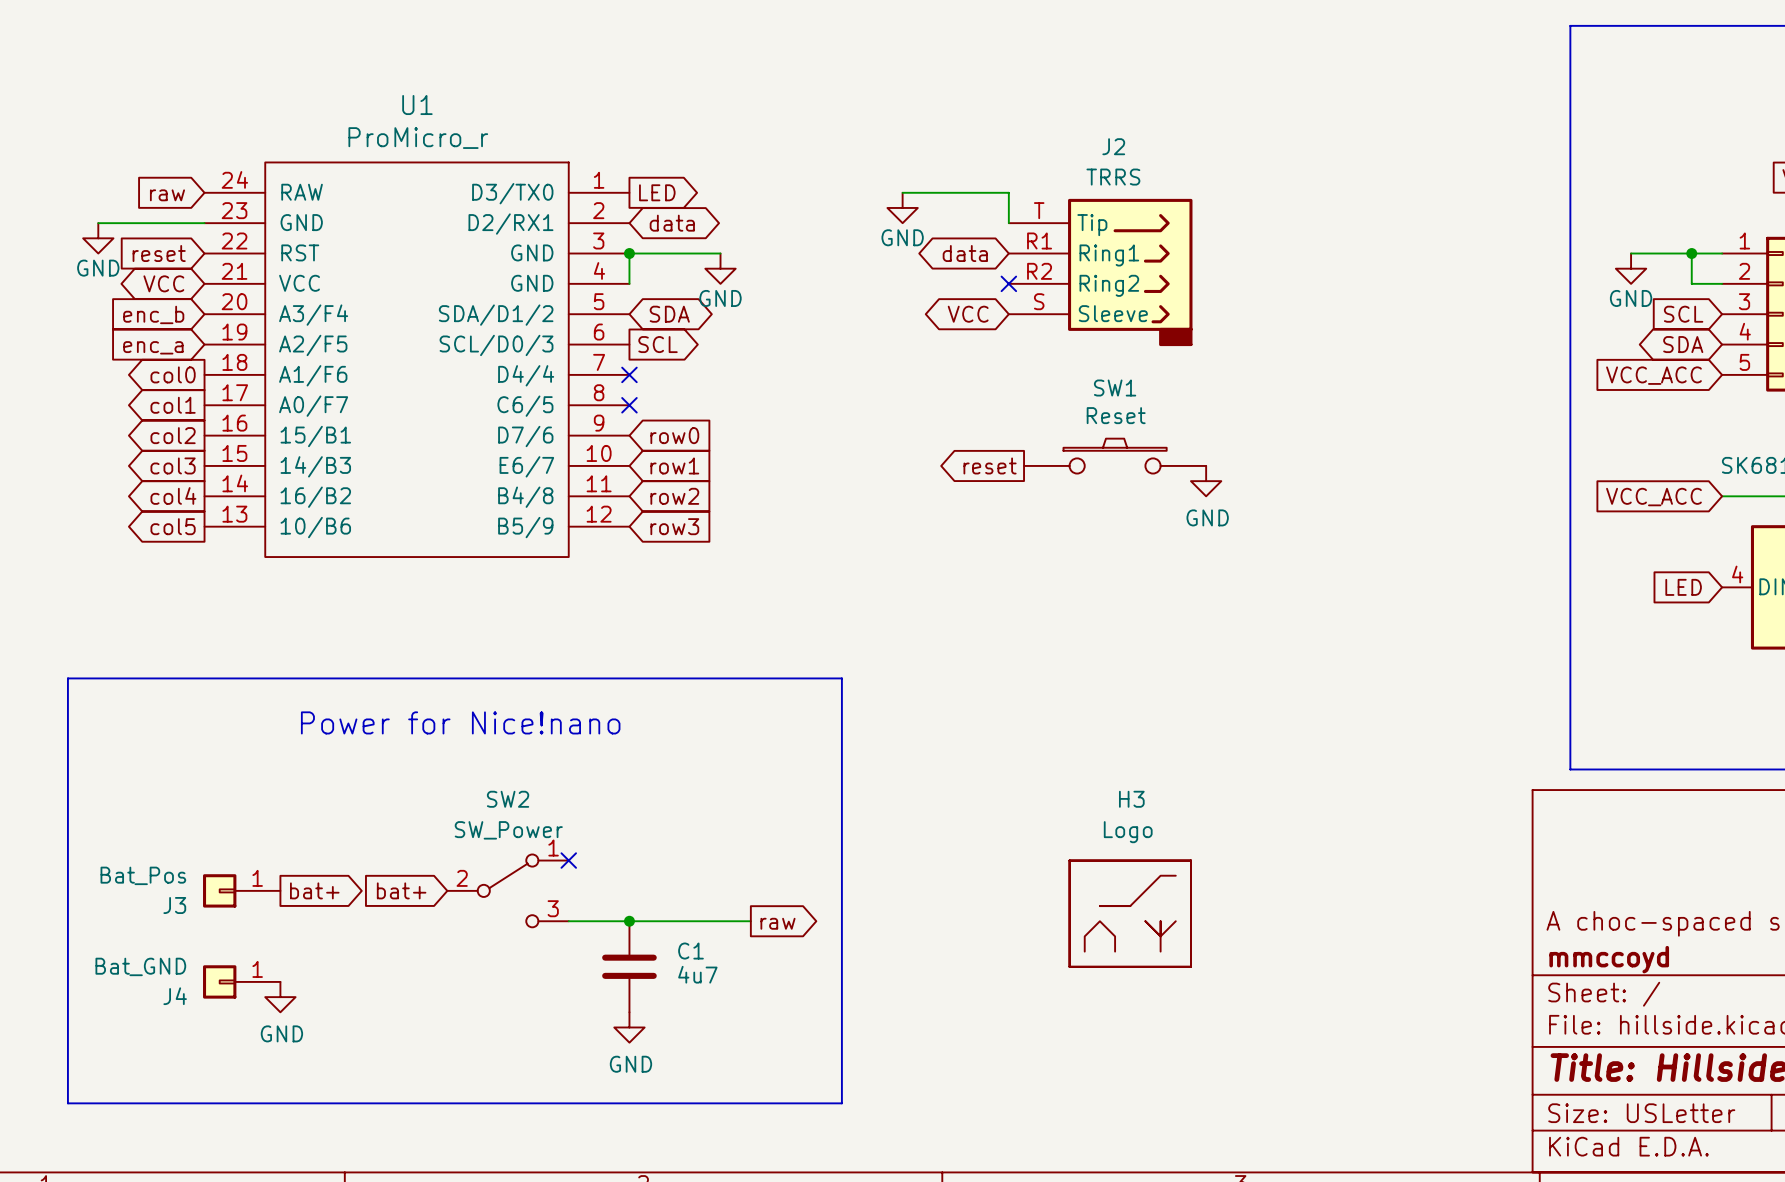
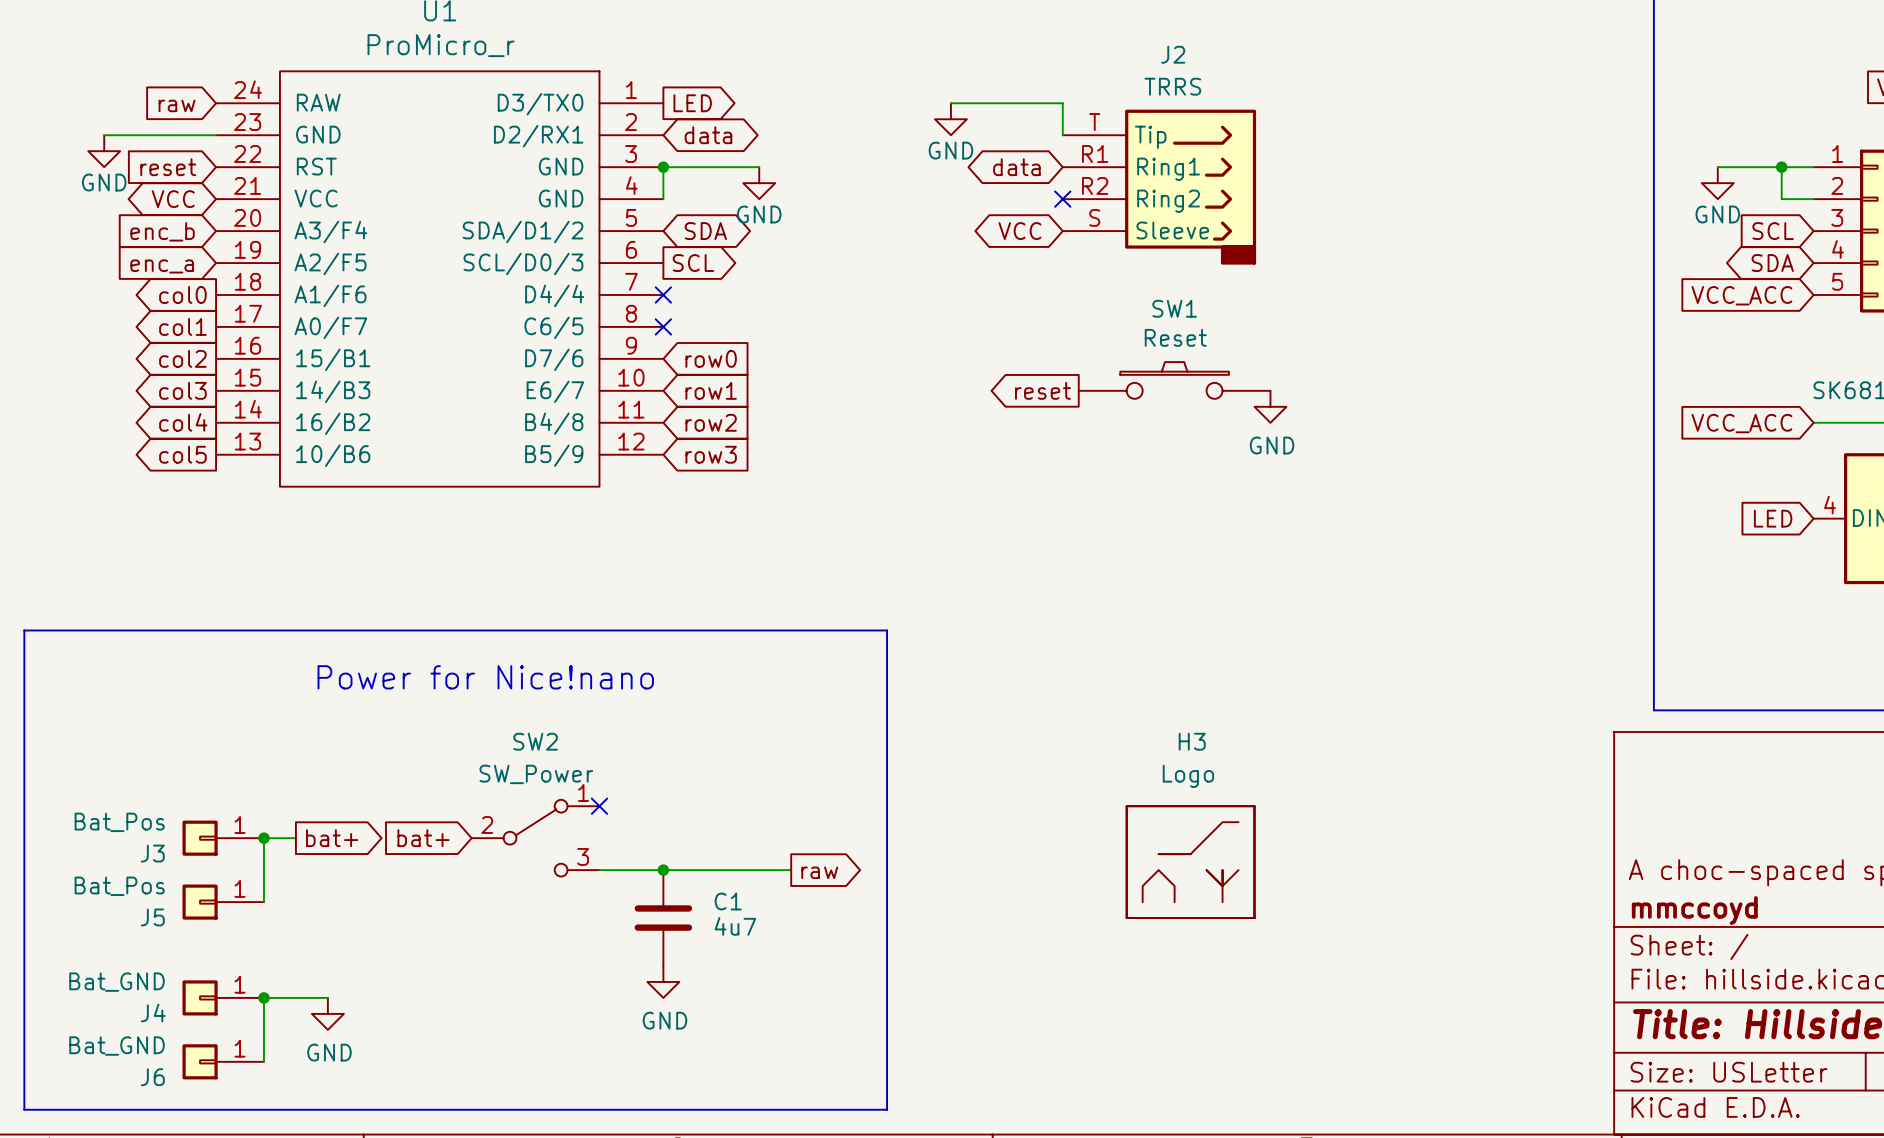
line: (841, 693) (841, 678) (67, 678) (67, 1103) (841, 1103) -> (887, 630) (24, 630) (24, 1109) (887, 1109) (887, 1061)
text position: Power for Nice!nano (460, 722) -> Power for Nice!nano (485, 677)
J3 position: (241, 890) -> (223, 838)
junction: none -> (263, 838)
wire: none -> (295, 838) (263, 838) (263, 902)
J5: none -> Bat_Pos (223, 902)
J4 position: (241, 981) -> (223, 997)
power symbol position: GND (280, 997) -> GND (327, 1013)
junction: none -> (263, 997)
wire: none -> (327, 997) (263, 997) (263, 1061)
J6: none -> Bat_GND (223, 1061)

